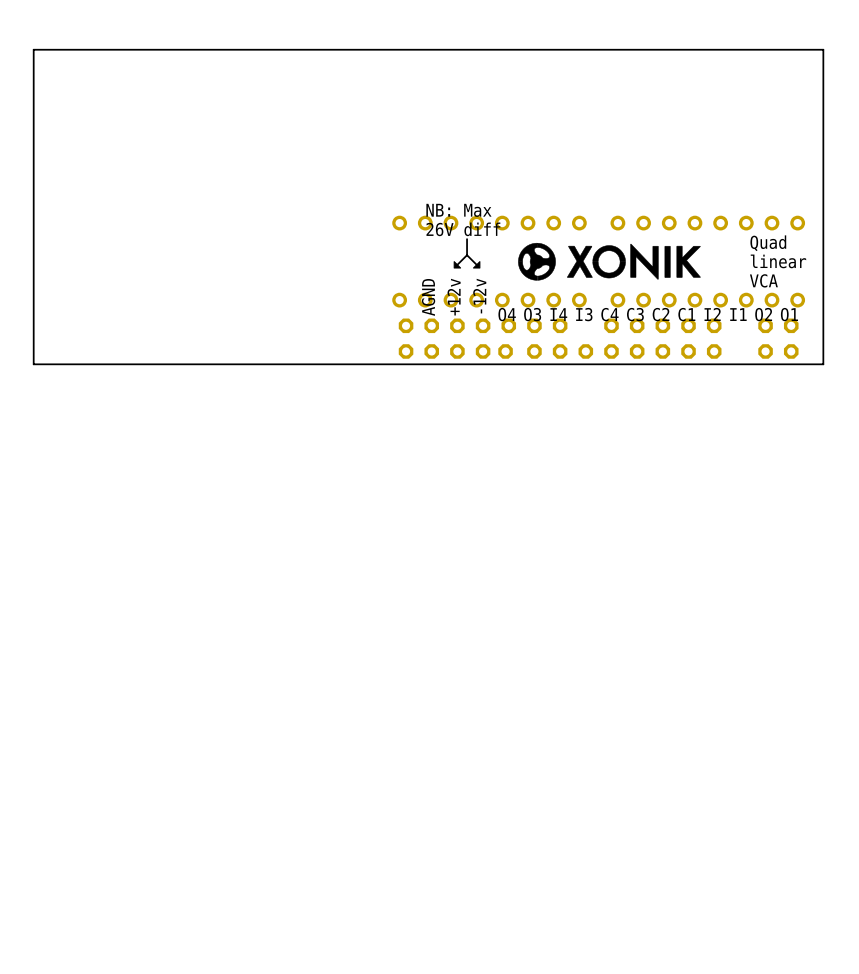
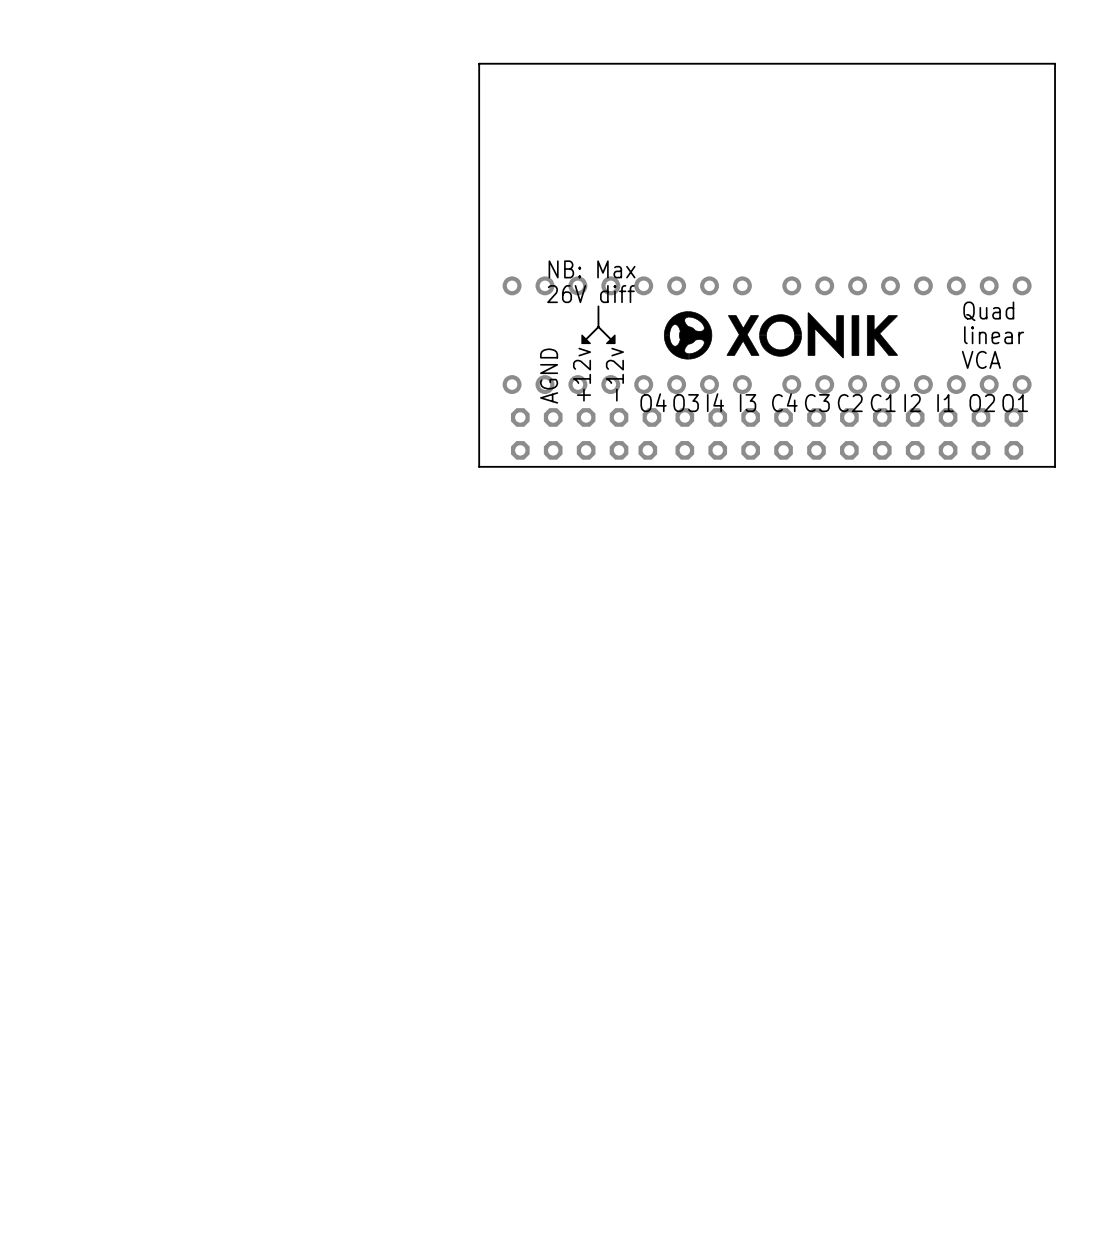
board edge: (373, 49) (33, 49) (33, 364) (373, 364) -> (479, 63) (479, 466)
part: none -> (750, 417)
part: none -> (948, 417)
part: none -> (948, 450)

